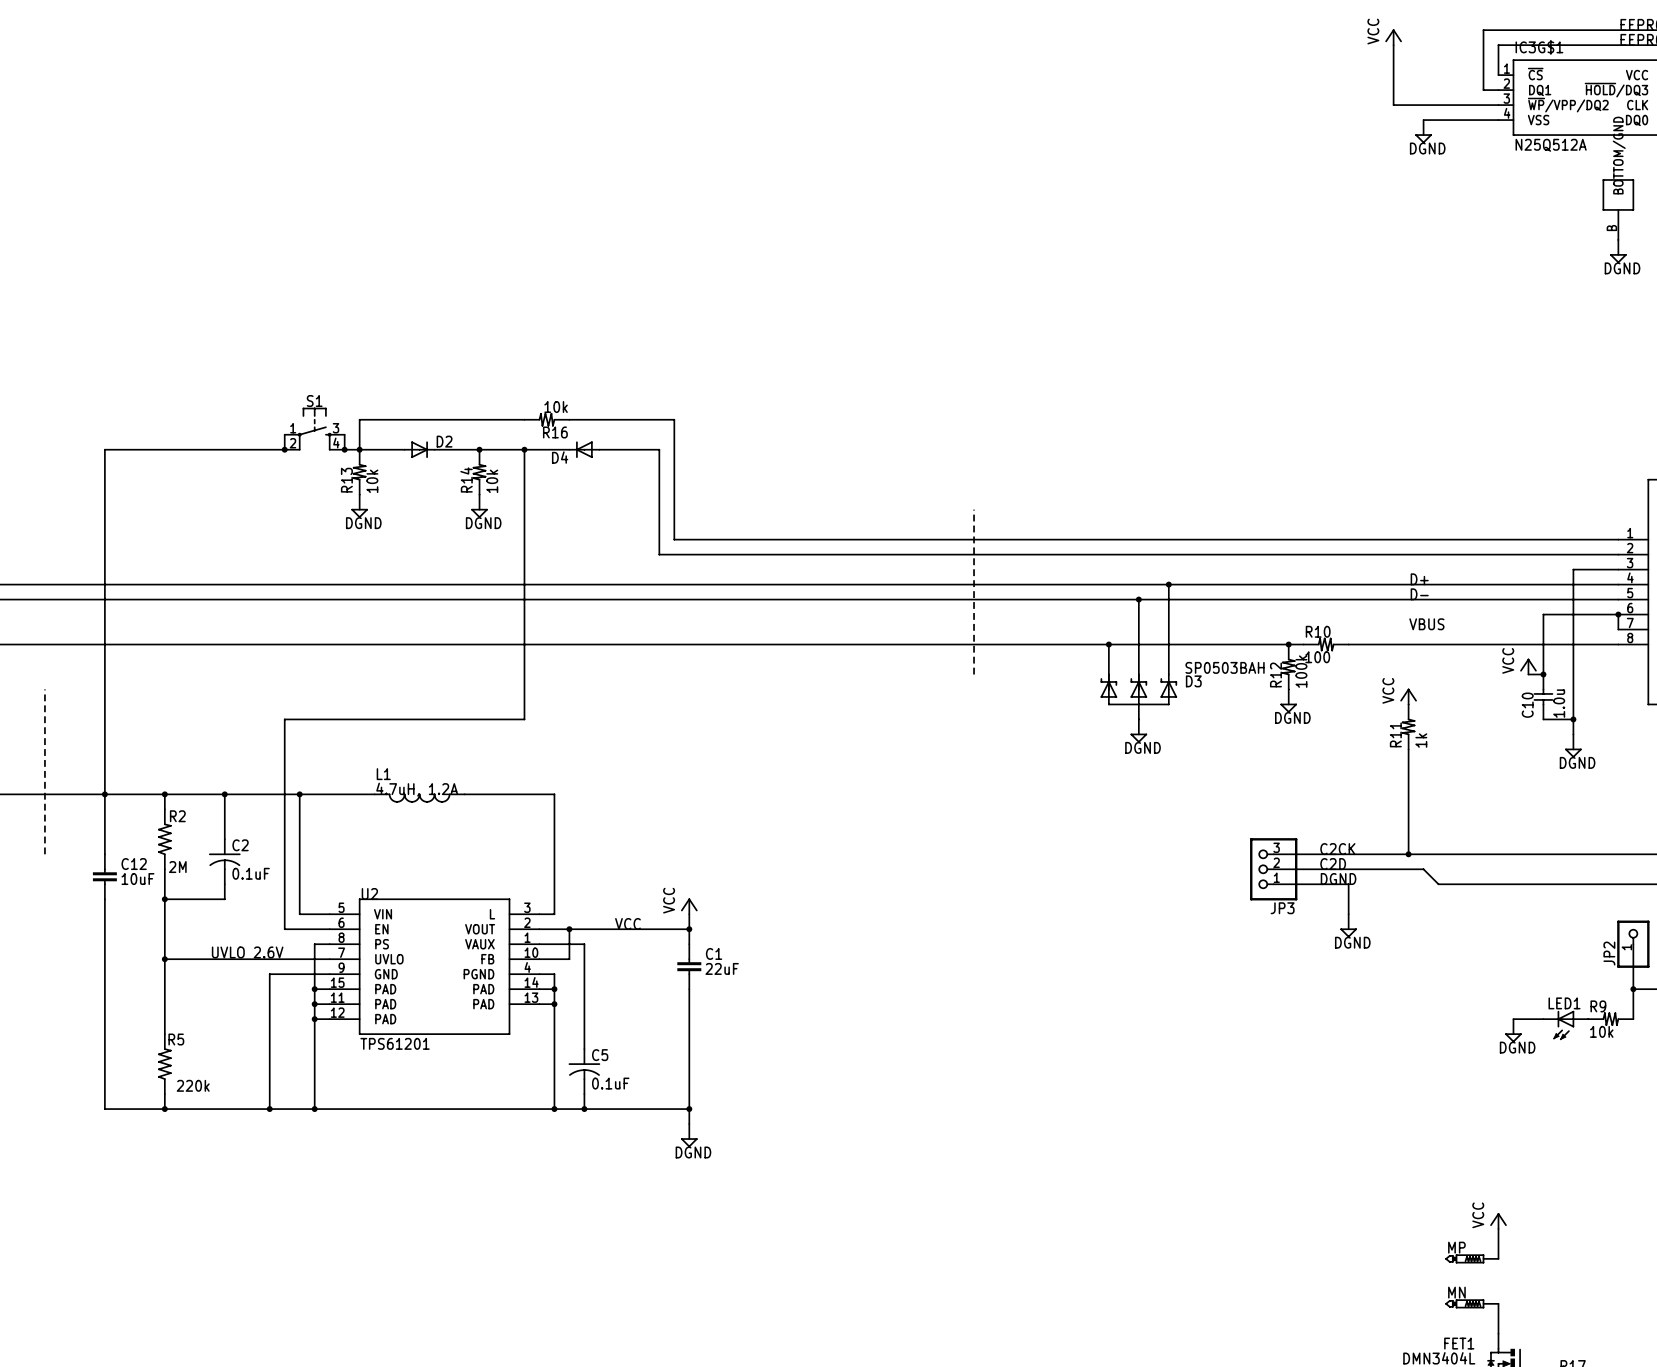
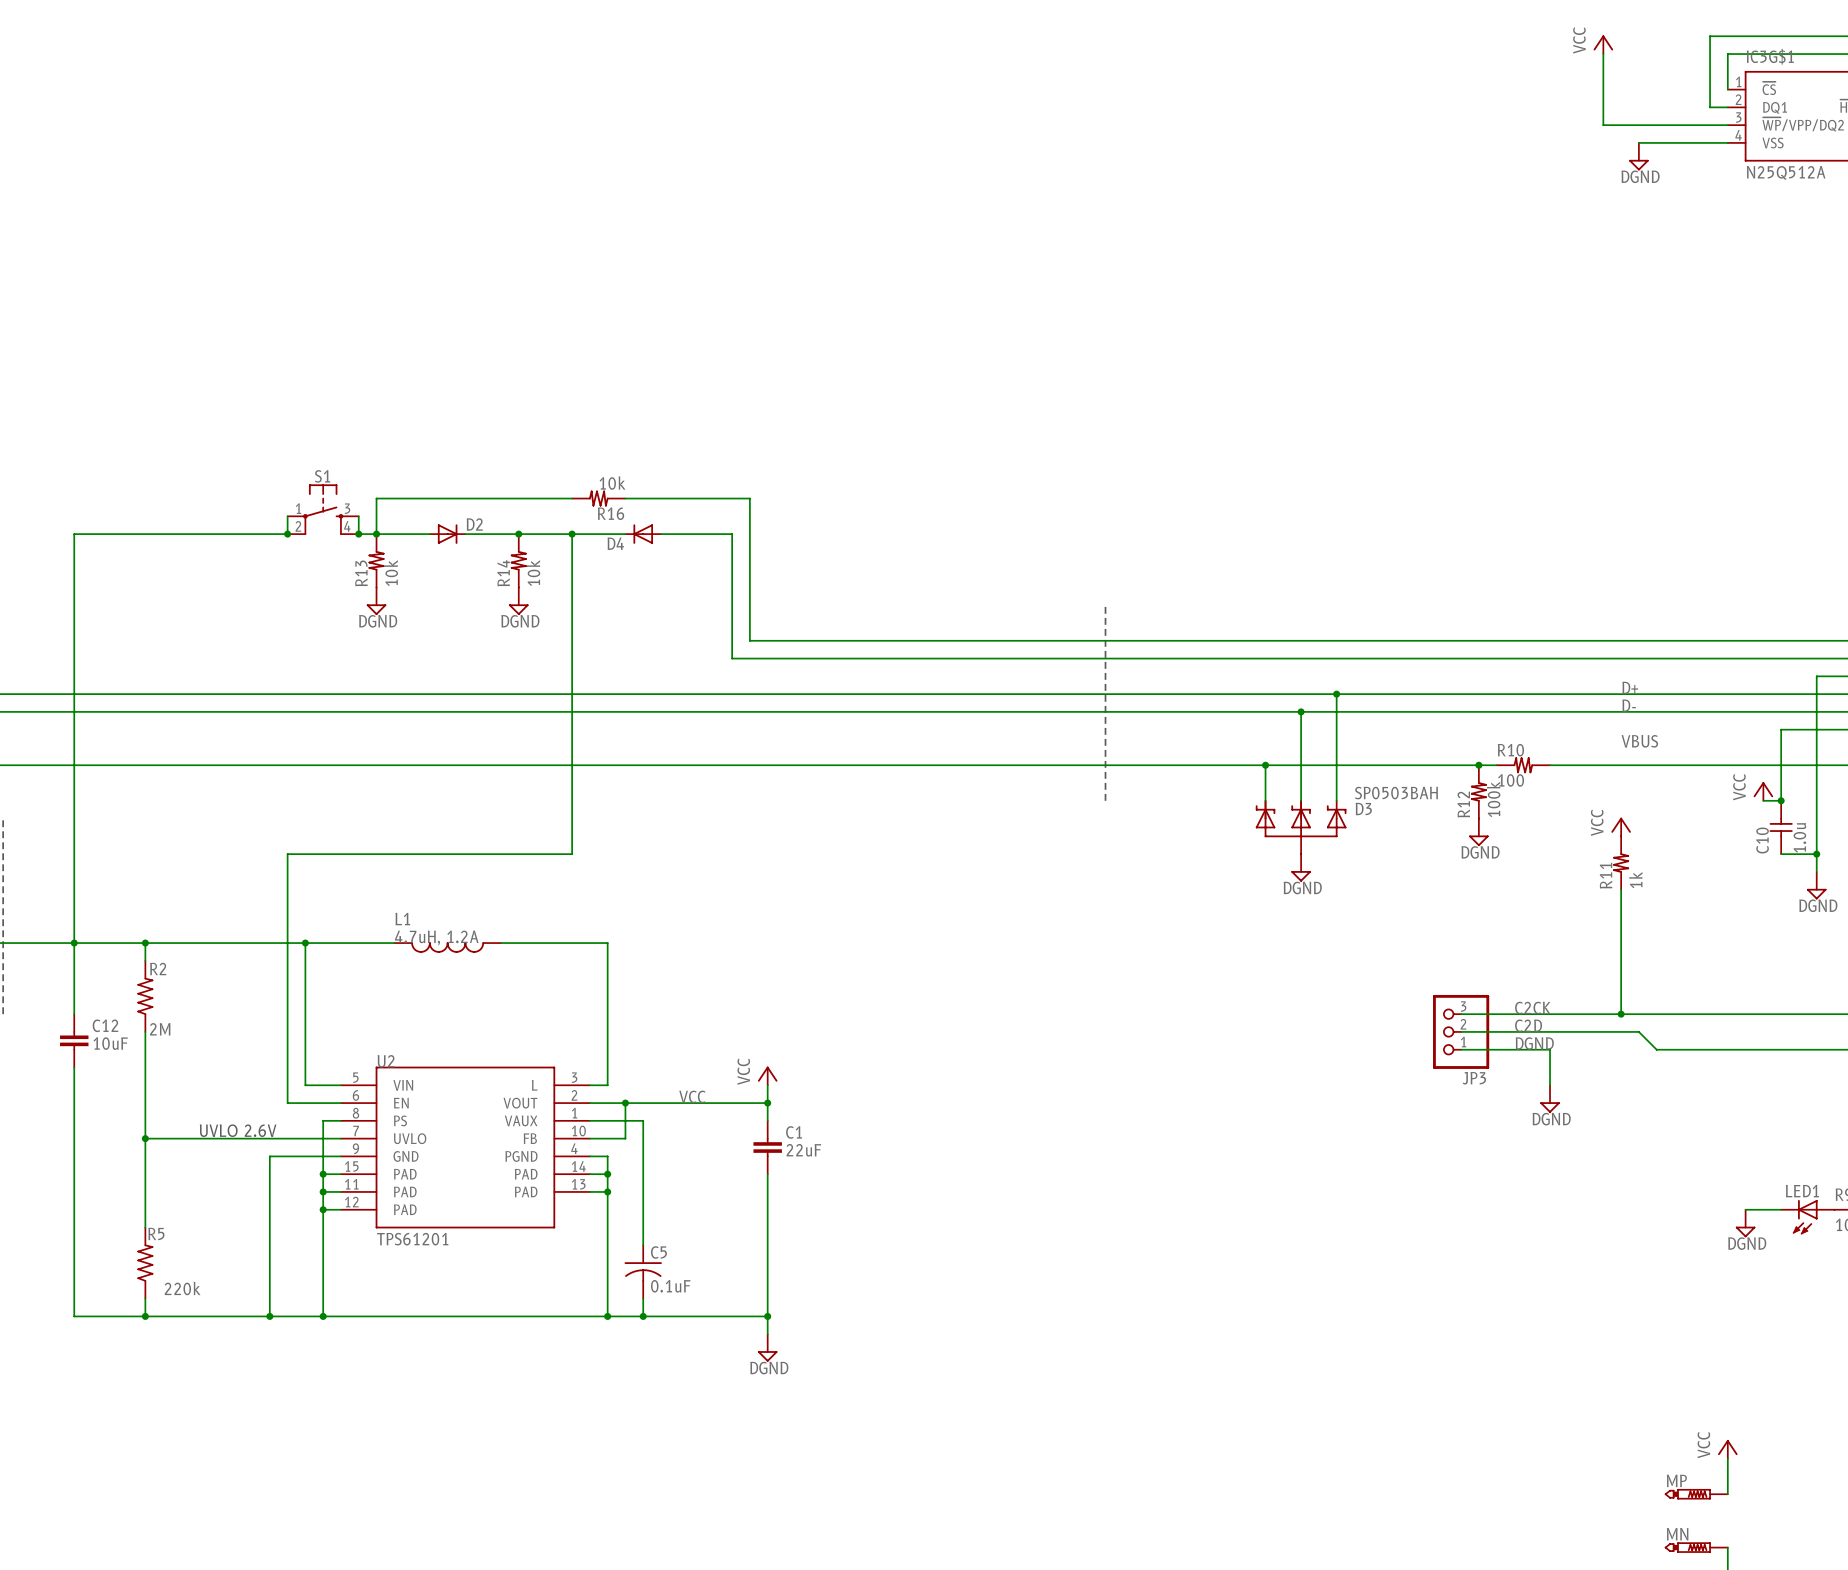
wire: (224, 794) (224, 839) -> none
junction: (224, 794) -> none
C2: 0.1uF (224, 861) -> none
wire: (224, 884) (224, 899) (164, 899) -> none
junction: (164, 899) -> none

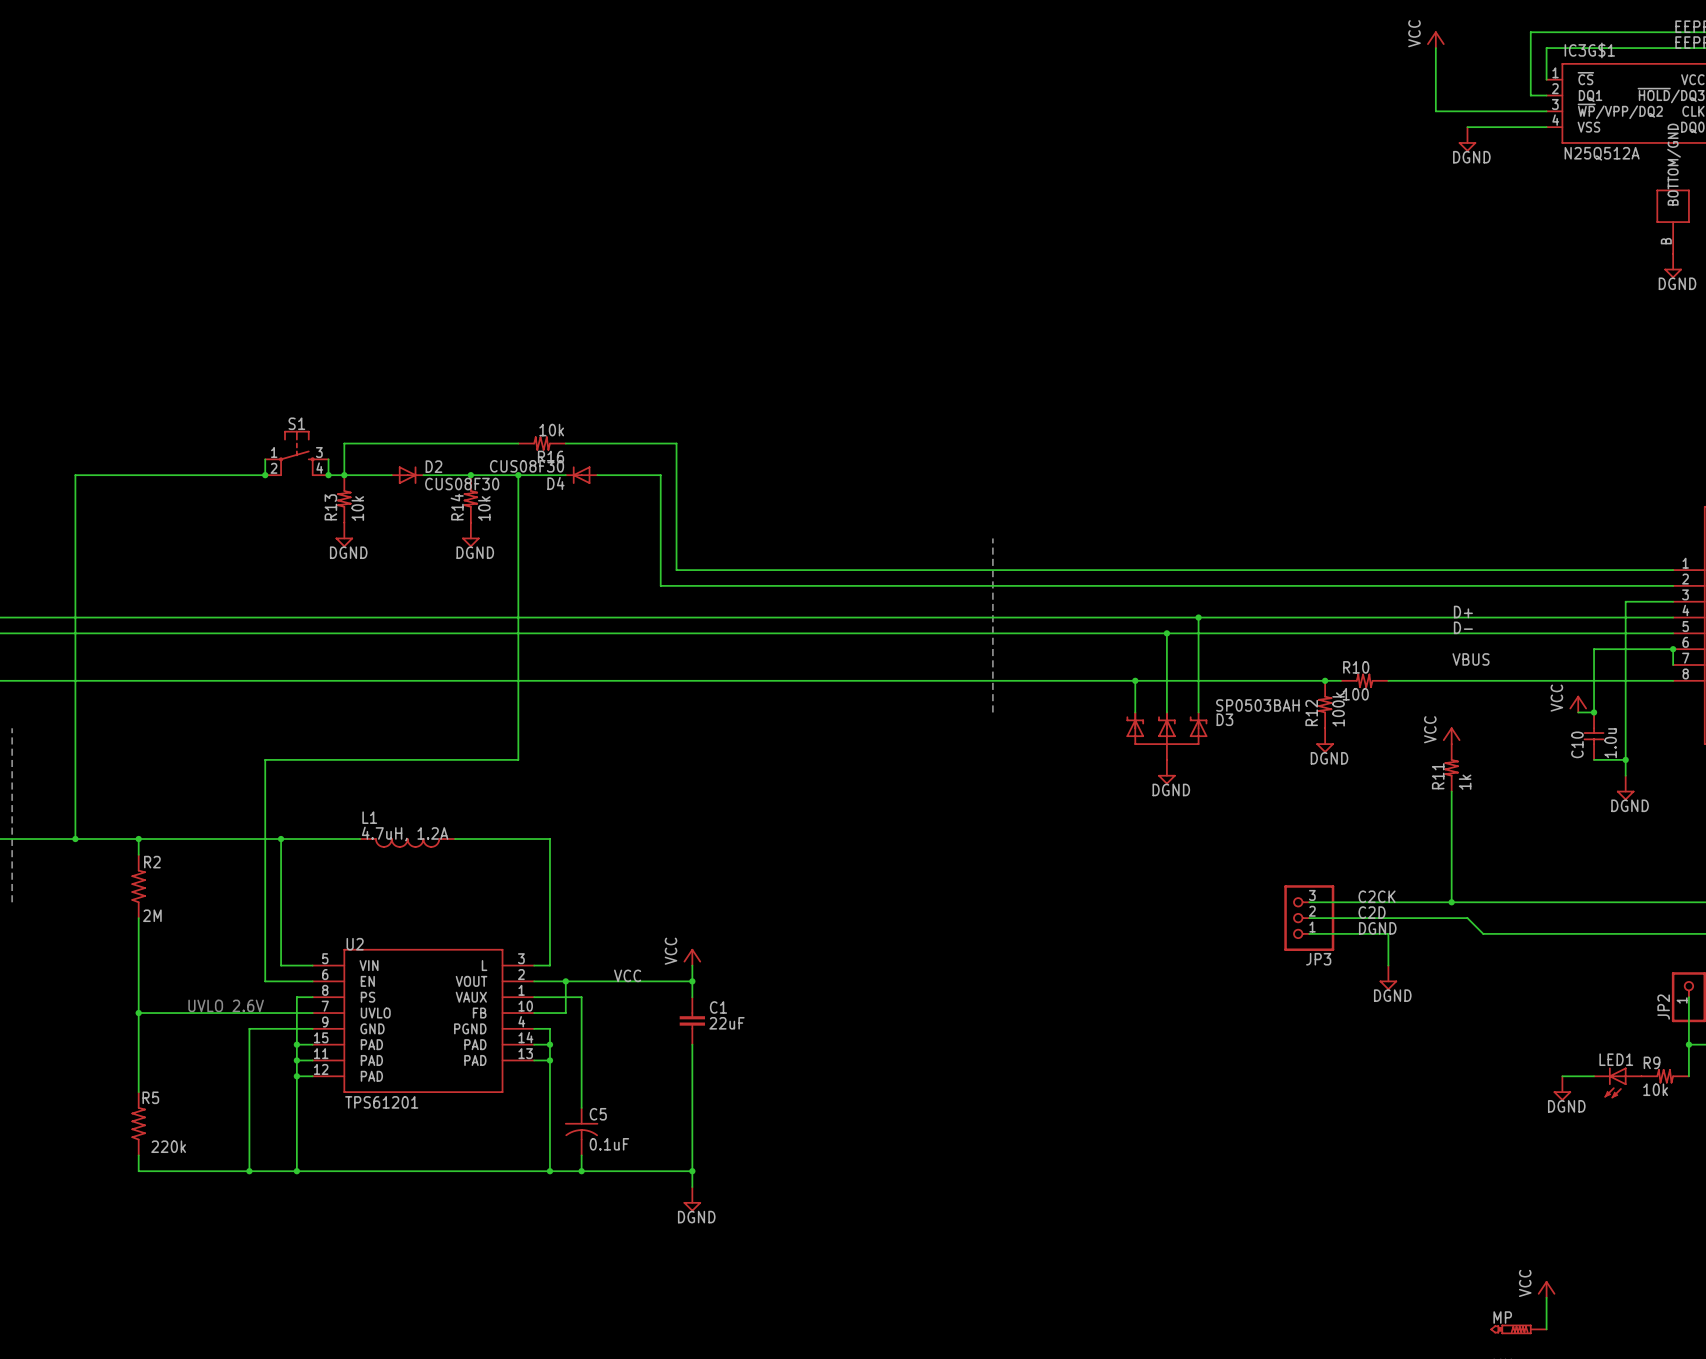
D4 value: none -> CUS08F30 (527, 466)
D2 value: none -> CUS08F30 (462, 484)
wire: (74, 943) (74, 1014) -> none
C12: 10uF (74, 1040) -> none
wire: (74, 1067) (74, 1316) (145, 1316) -> none
junction: (145, 1316) -> none

